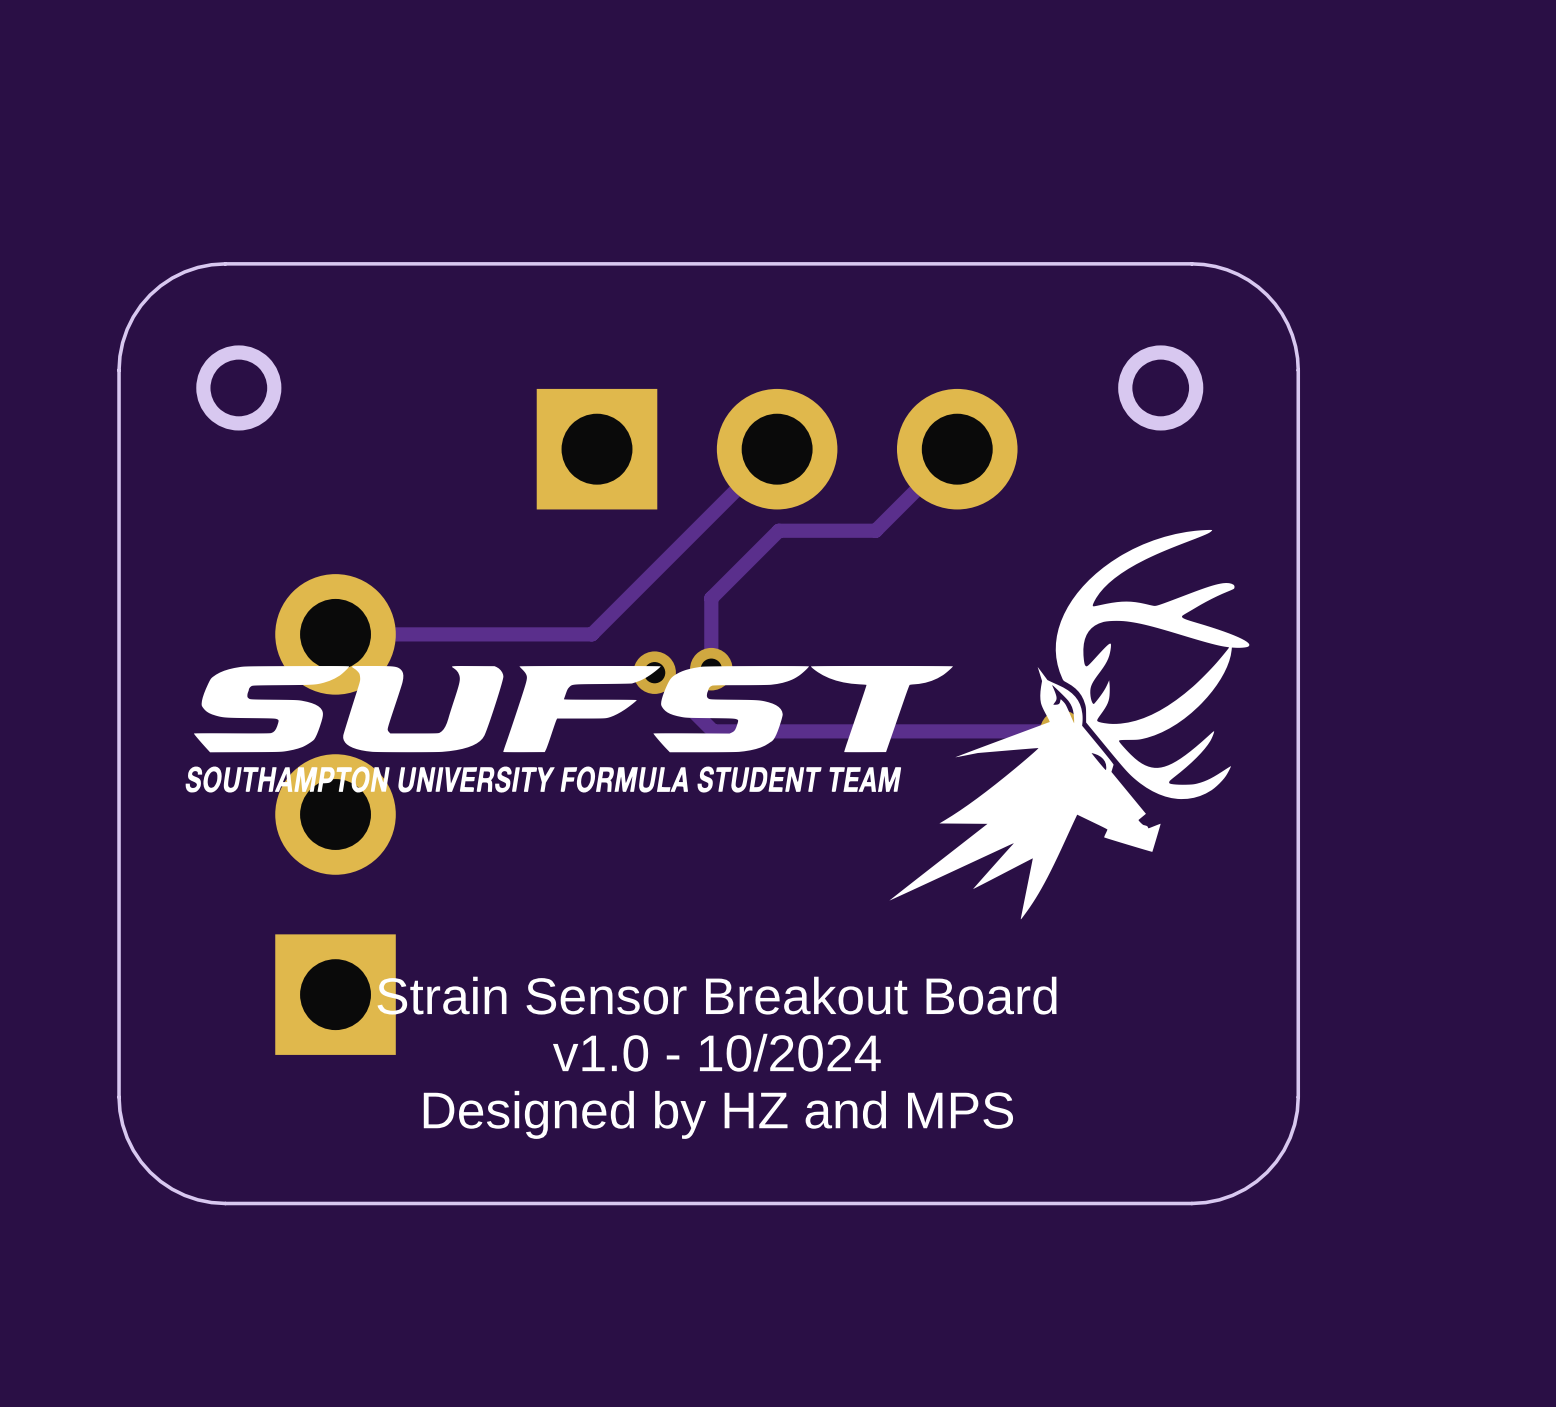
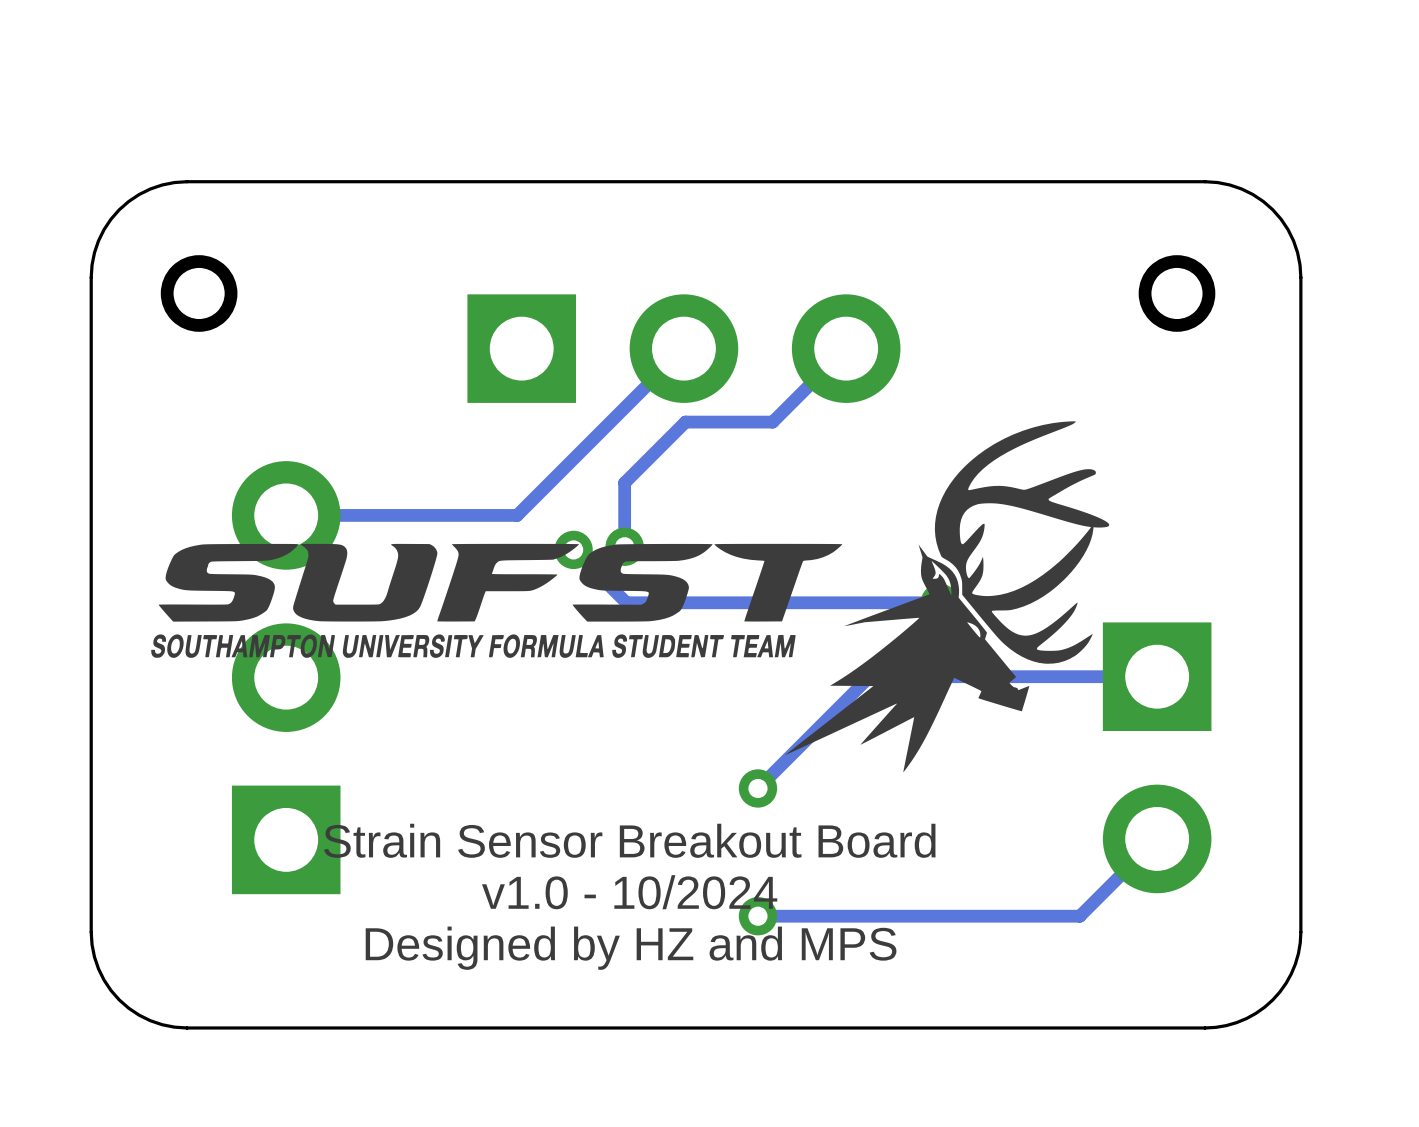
board edge: (1191, 263) (1227, 269) (1248, 280) (1267, 295) (1281, 313) (1292, 335) (1298, 370) (1297, 1111) (1290, 1137) (1276, 1161) (1267, 1172) (1256, 1181) (1232, 1195) (1205, 1202) (1191, 1203) -> (1057, 181) (1205, 181) (1229, 184) (1241, 189) (1252, 194) (1272, 209) (1288, 229) (1297, 252) (1300, 277) (1300, 932) (1295, 963) (1279, 991) (1264, 1007) (1246, 1018) (1226, 1025) (1205, 1027) (1057, 1027)
round board edge position: (1160, 387) -> (1176, 293)
track: none -> (1157, 676) (869, 676) (757, 788)
part: none -> (1157, 757)
via: none -> (757, 788)
track: none -> (1157, 838) (1079, 916) (757, 916)
via: none -> (757, 916)

